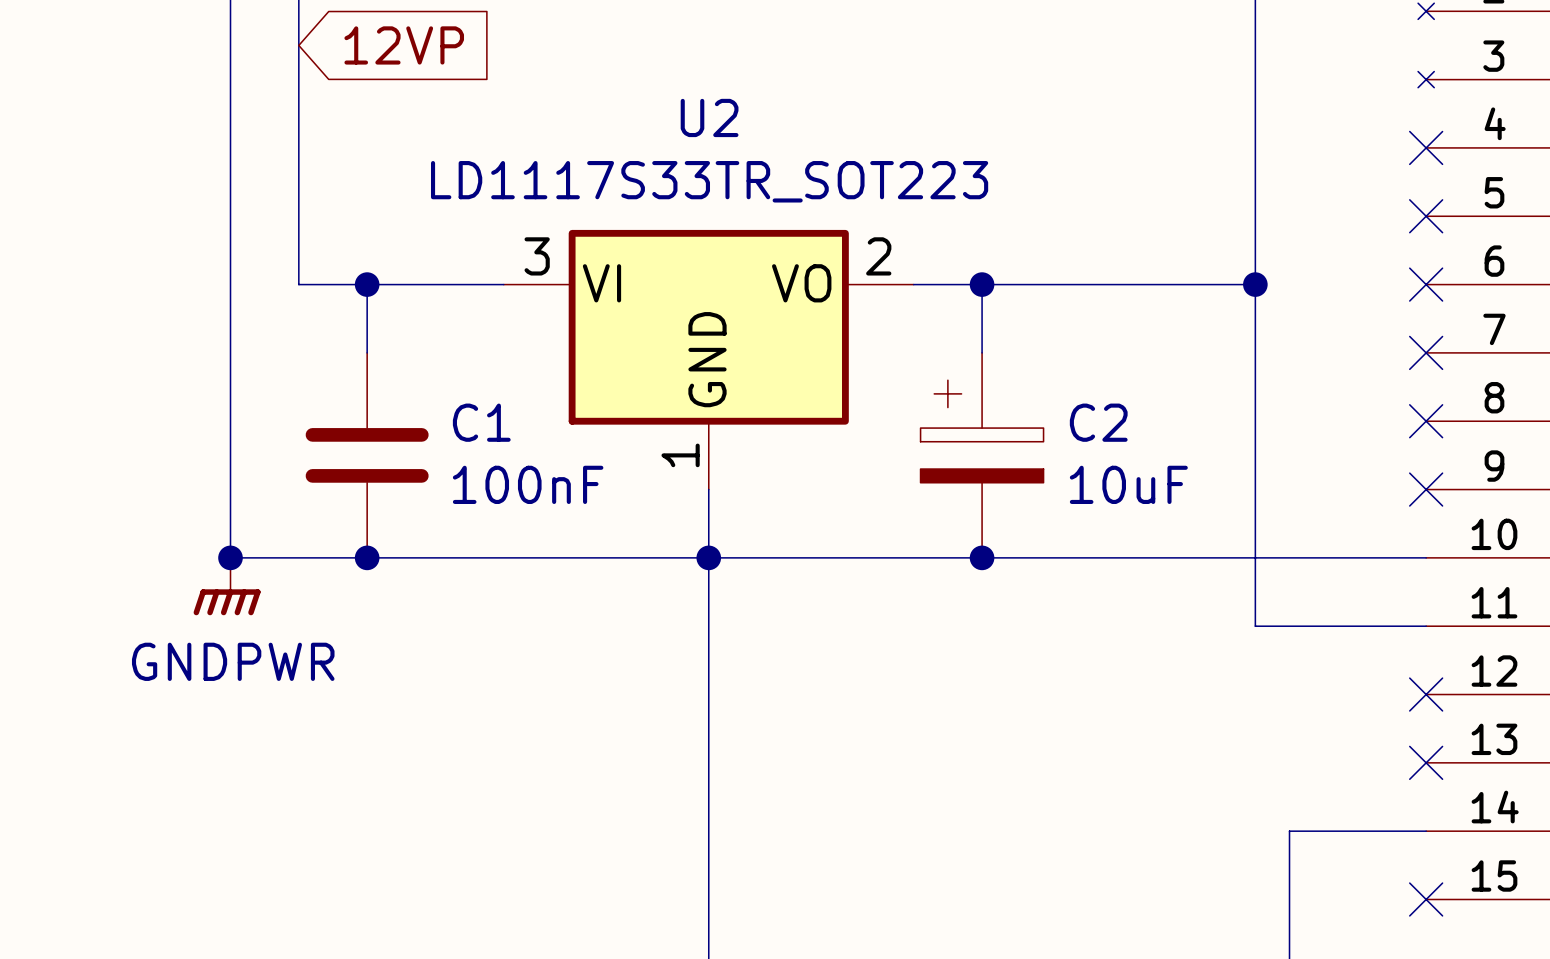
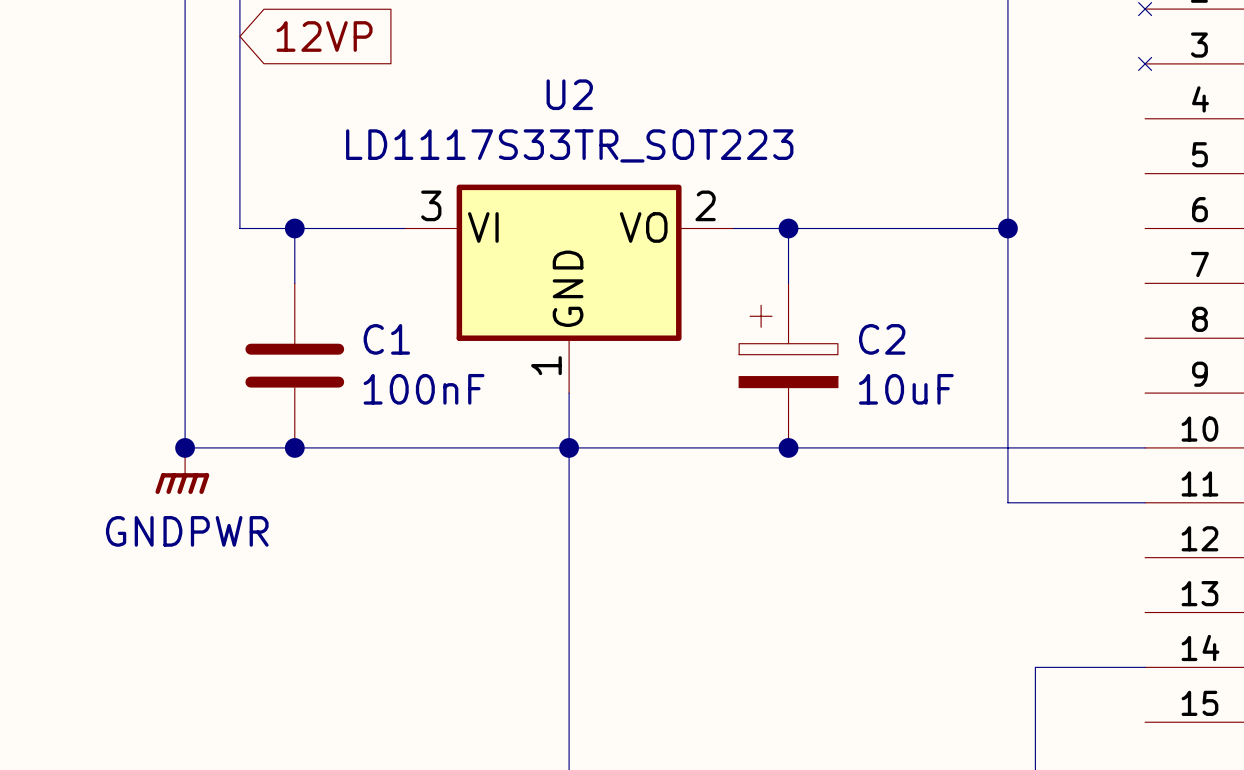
no-connect mark: (1426, 147) -> none
no-connect mark: (1426, 216) -> none
no-connect mark: (1426, 284) -> none
no-connect mark: (1426, 352) -> none
no-connect mark: (1426, 421) -> none
no-connect mark: (1426, 489) -> none
no-connect mark: (1426, 694) -> none
no-connect mark: (1426, 762) -> none
no-connect mark: (1426, 899) -> none

